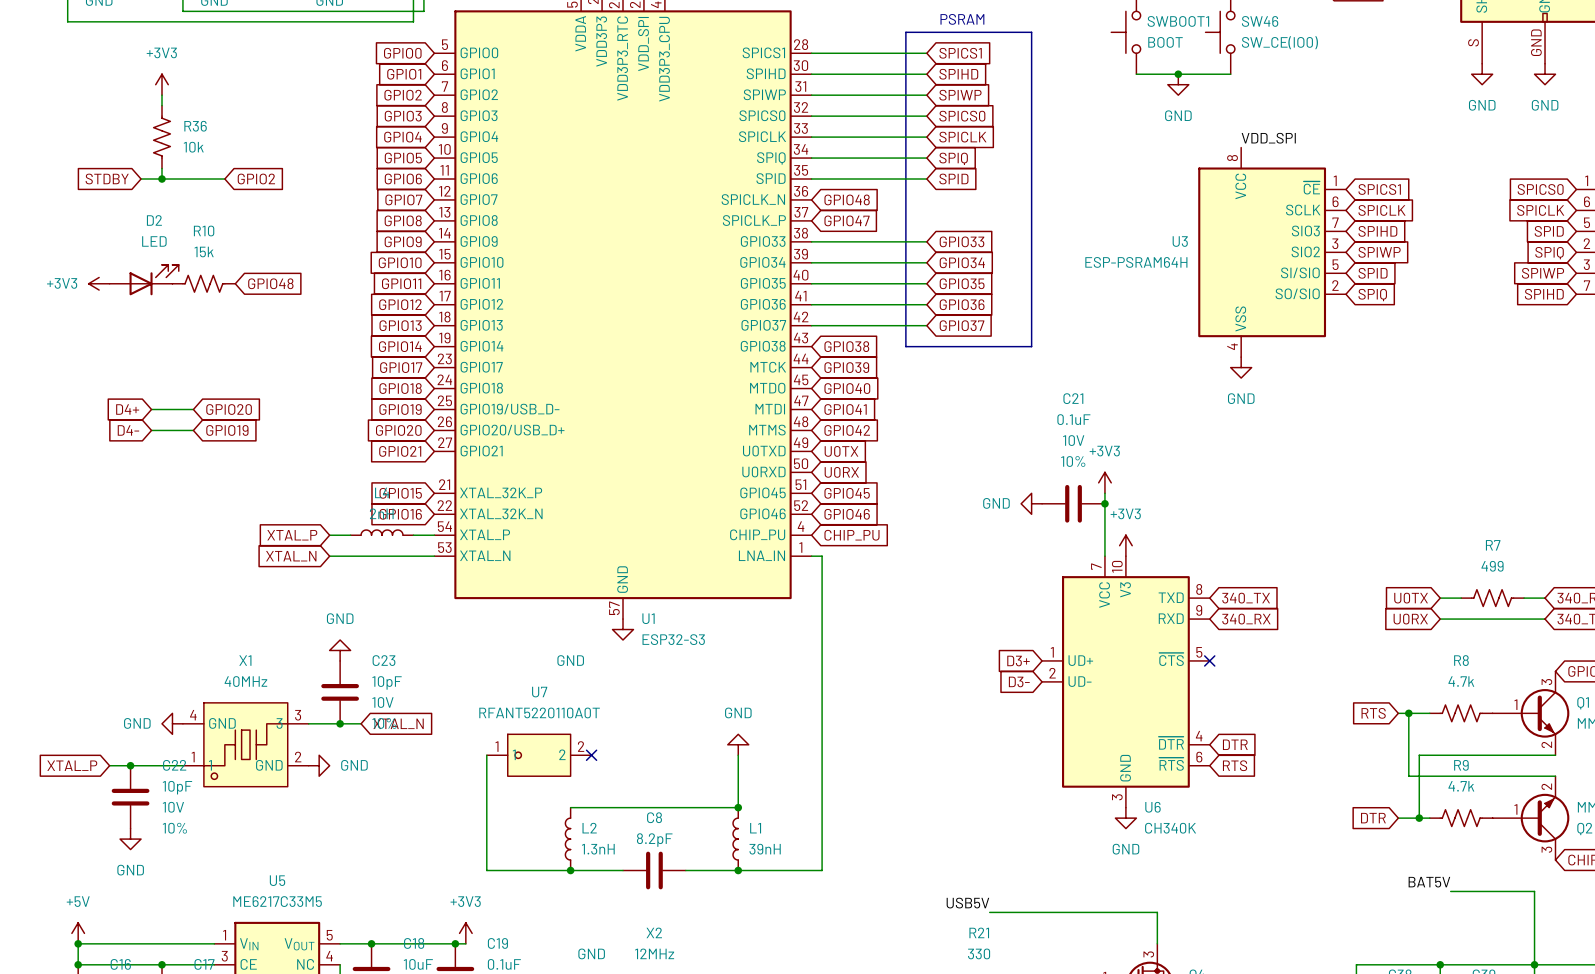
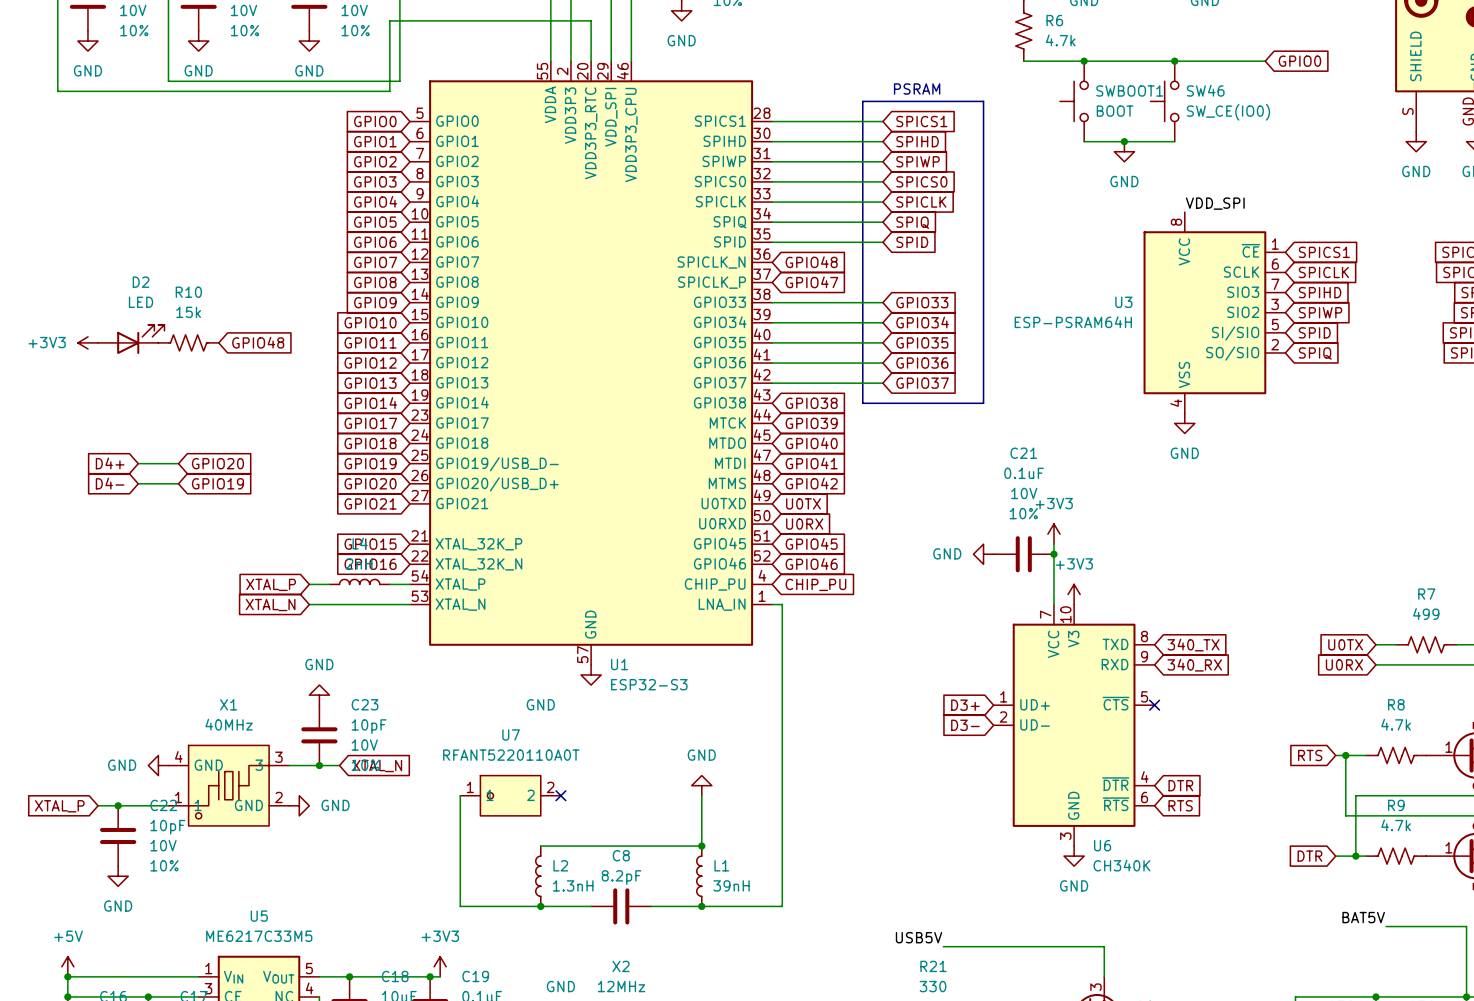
power symbol: +3V3 (161, 84) -> none
wire: (161, 95) (161, 105) -> none
R36: 10k (161, 137) -> none
wire: (161, 168) (161, 179) -> none
global label: STDBY (107, 179) -> none
wire: (141, 179) (224, 179) -> none
junction: (161, 179) -> none
global label: GPIO2 (256, 179) -> none

